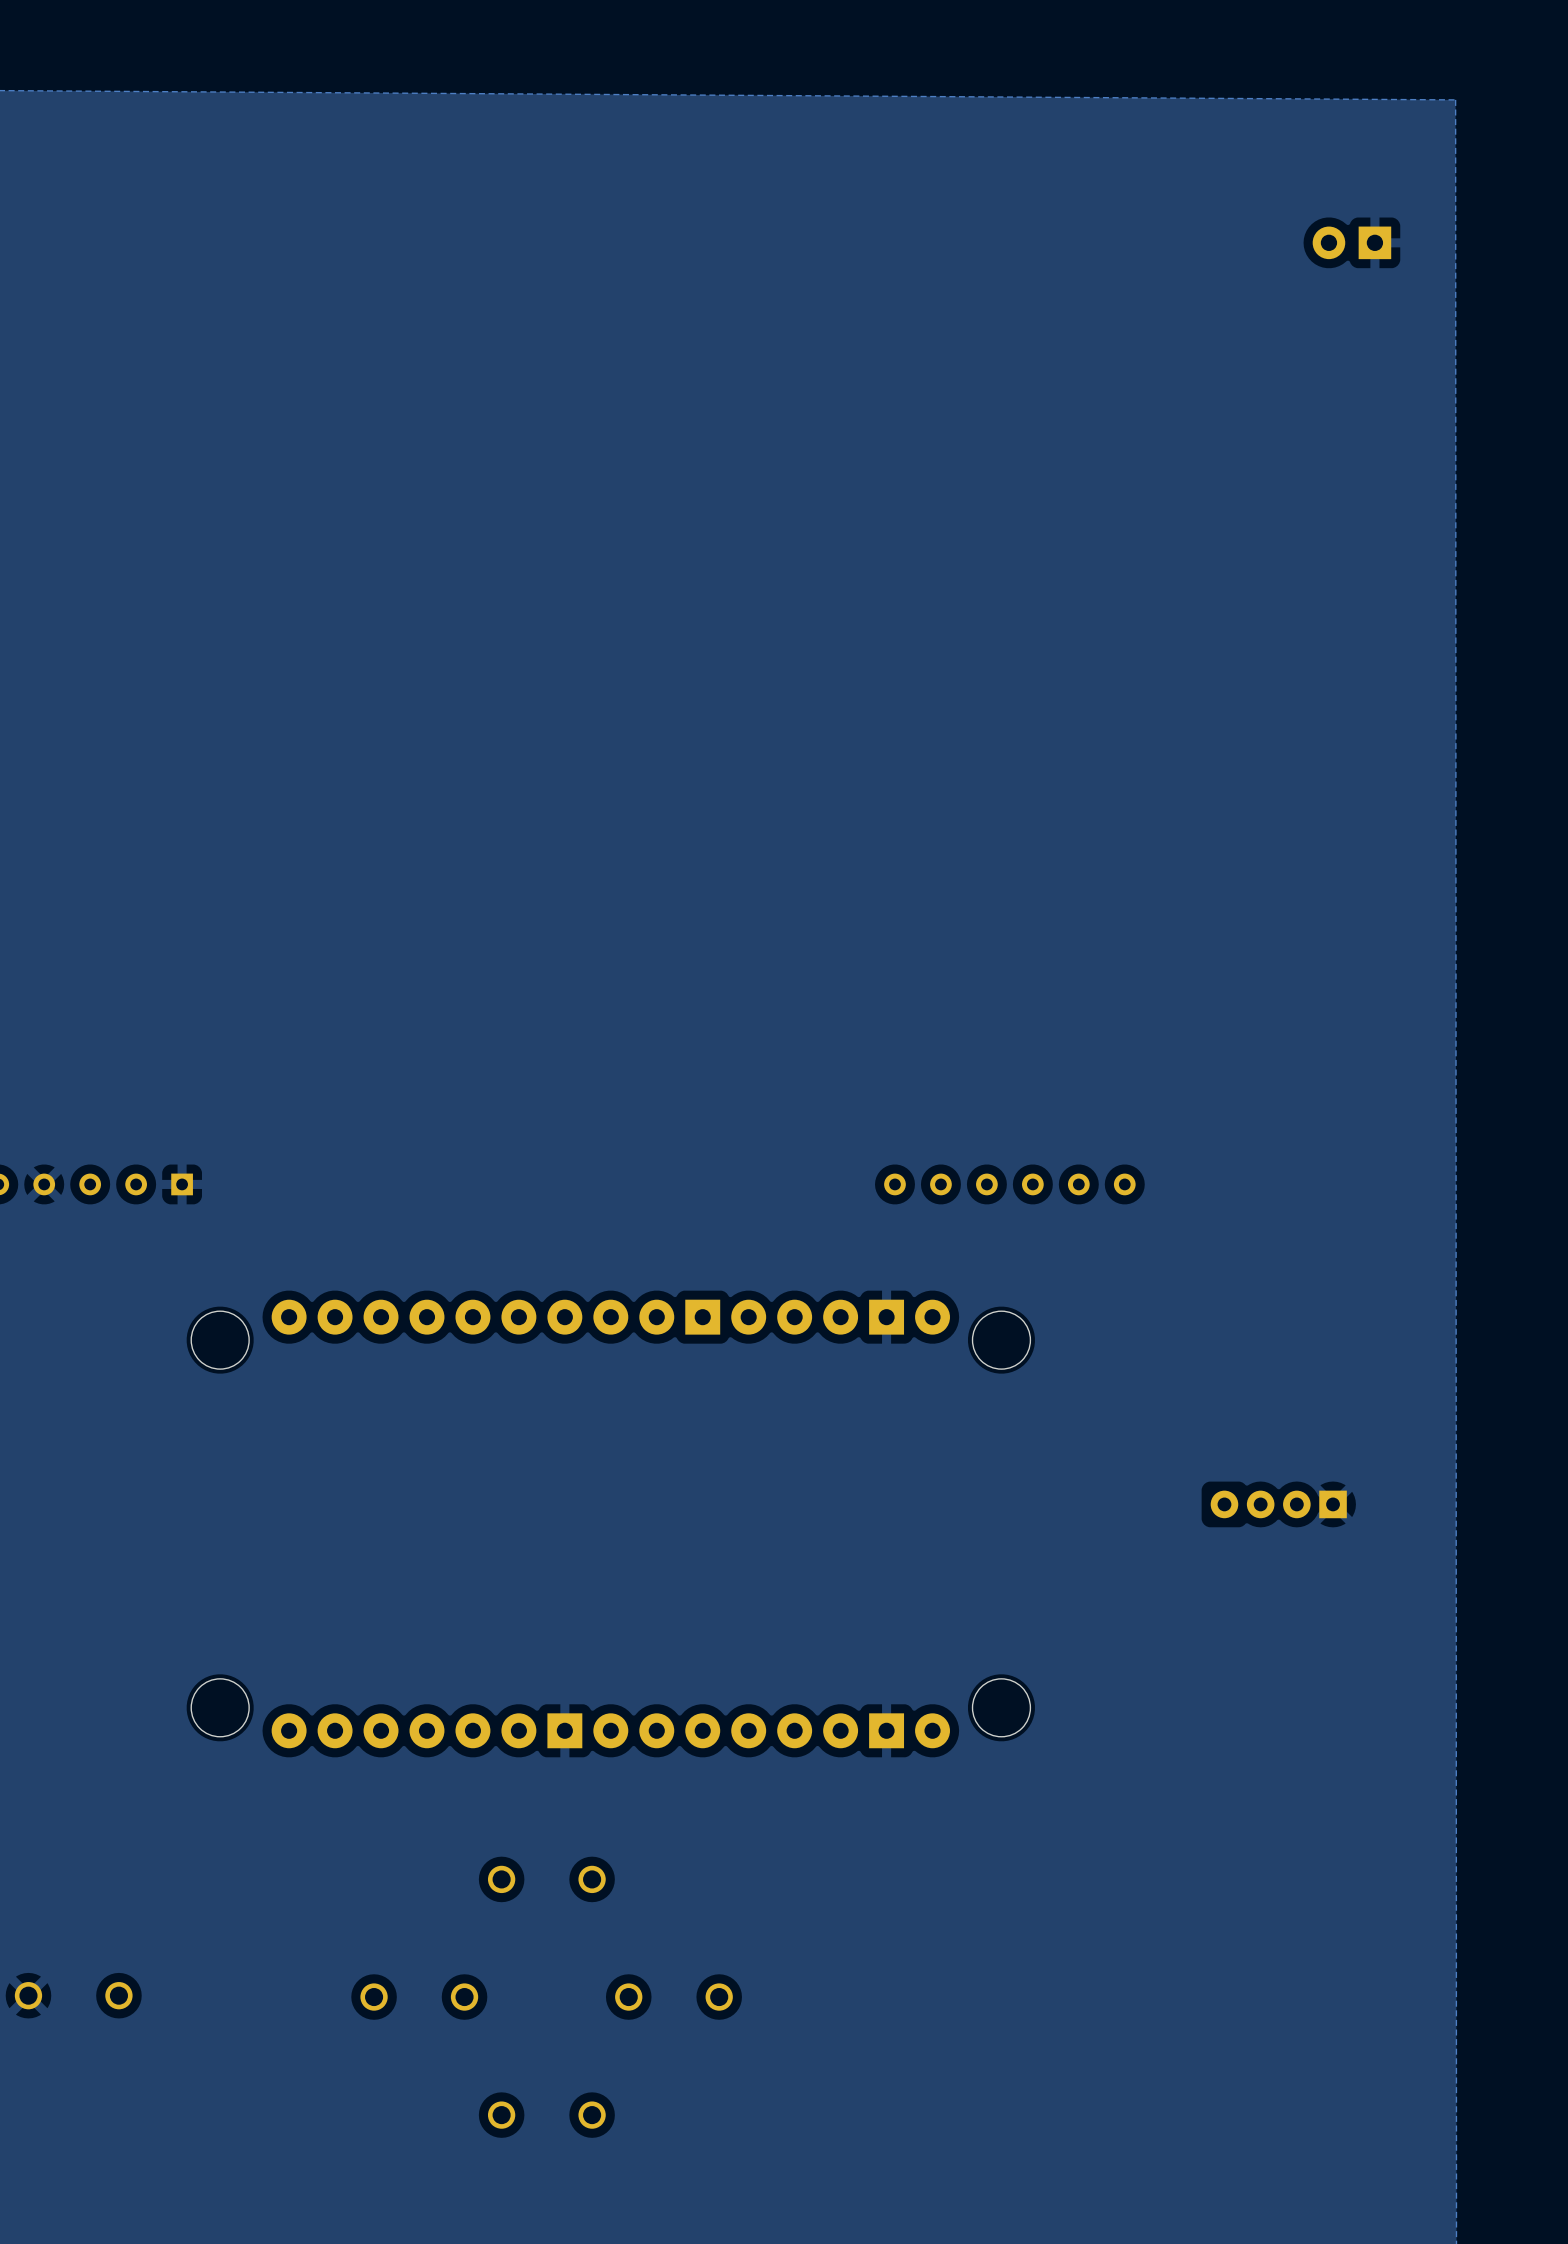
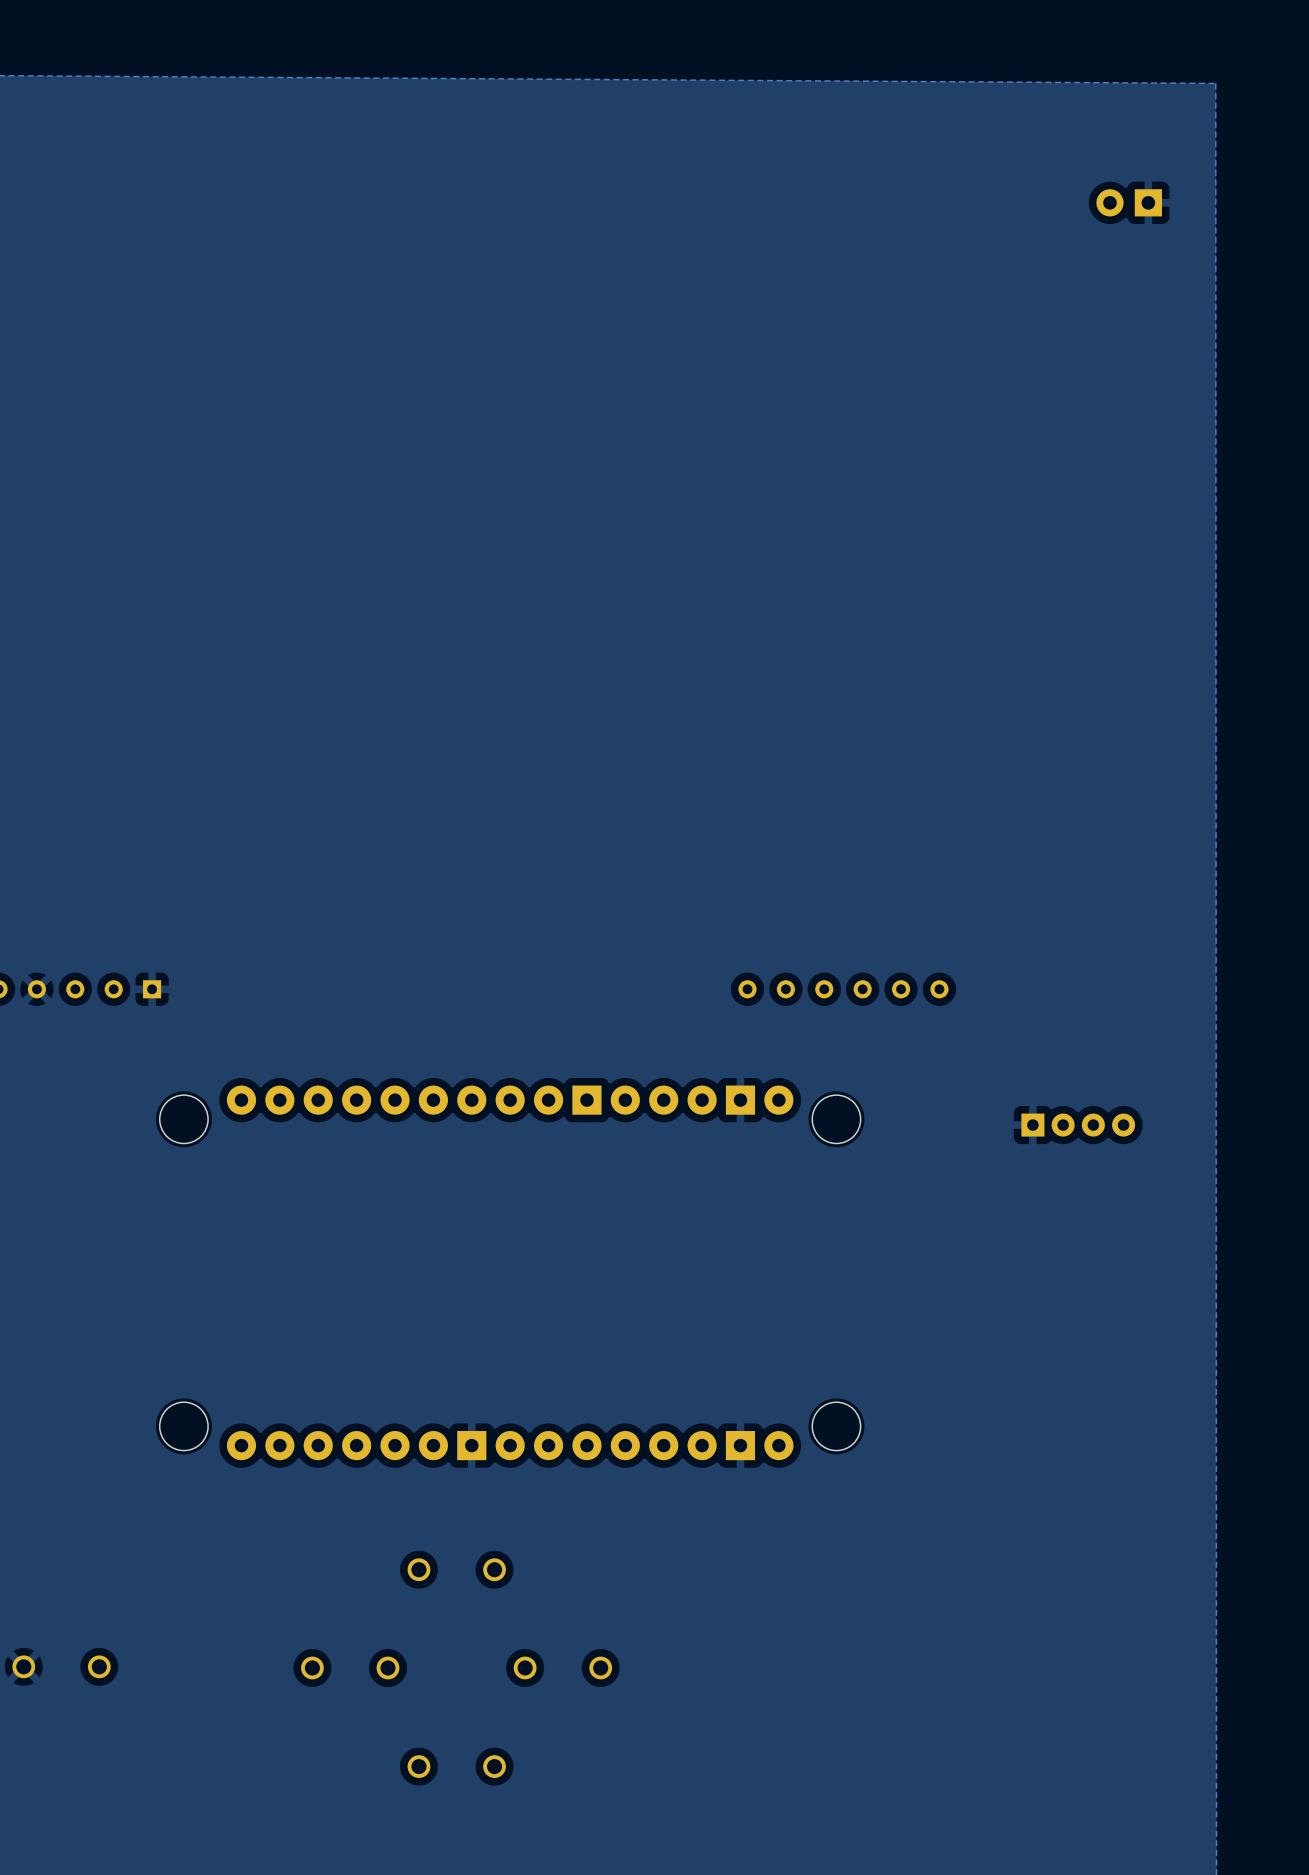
part rotation: 0° (1278, 1504) -> 180° (1078, 1125)
part position: (1278, 1504) -> (1078, 1125)

